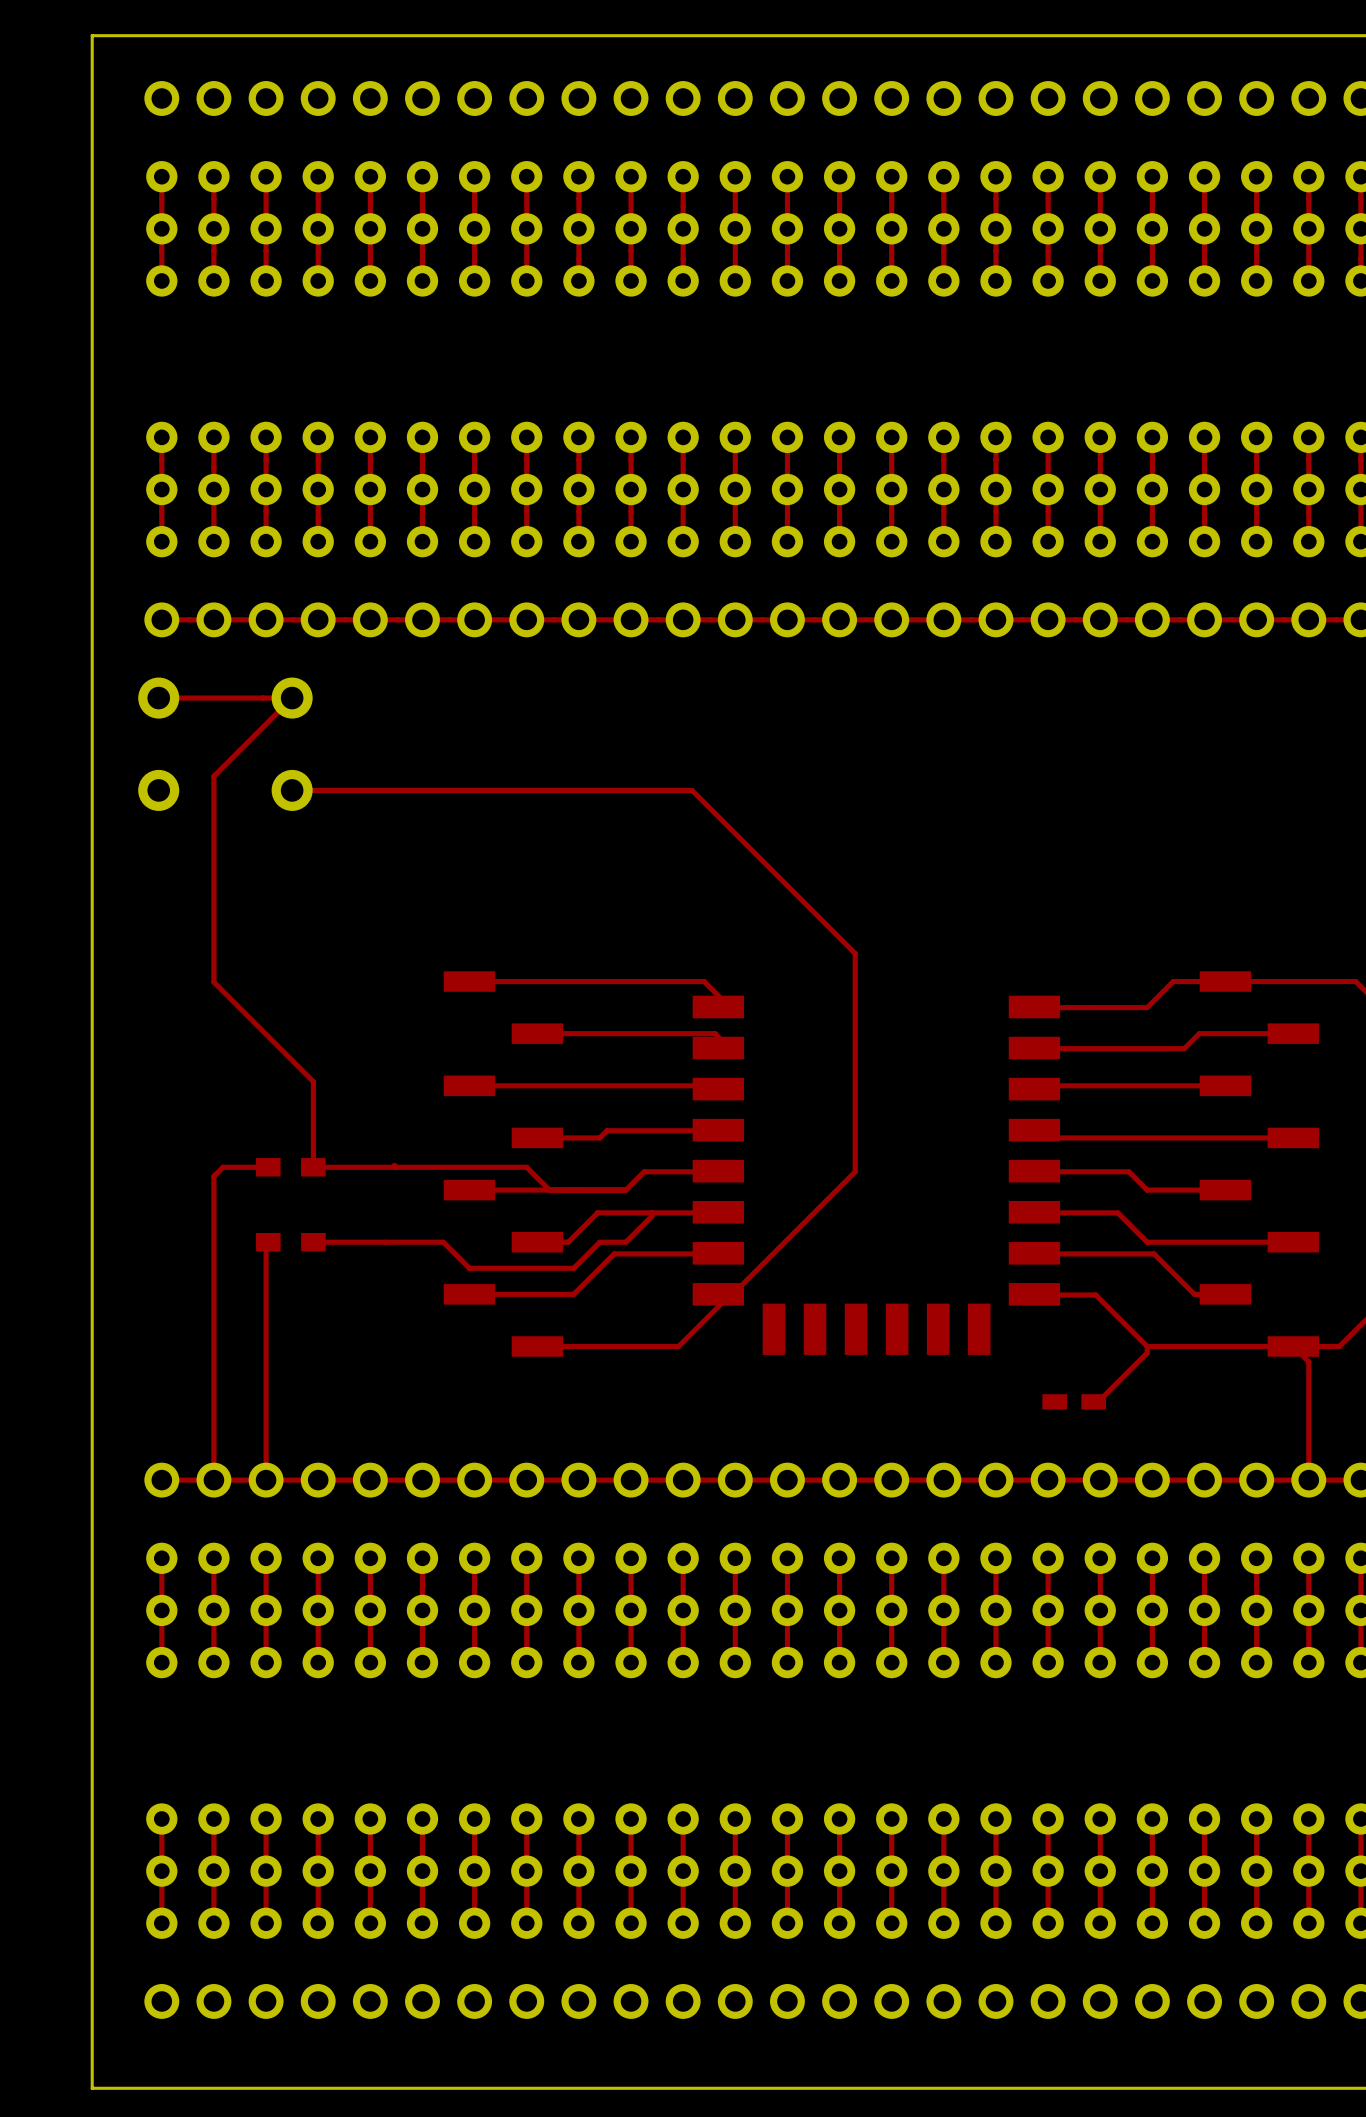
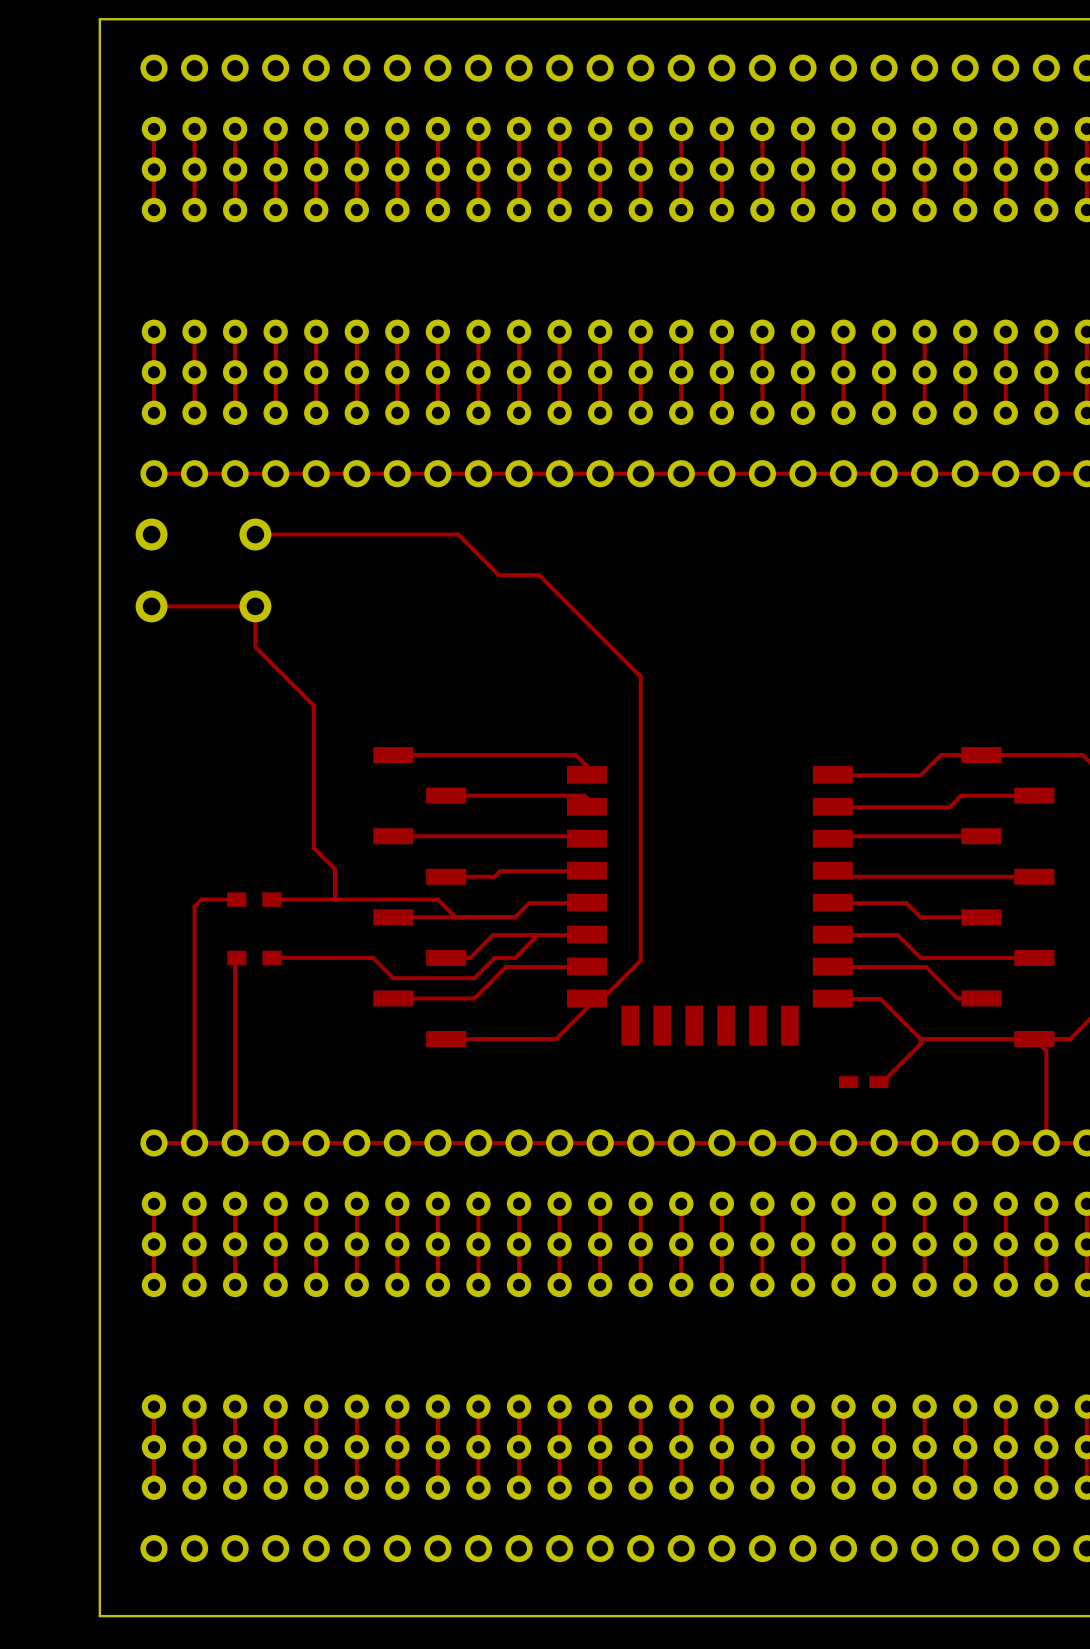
top track: (158, 698) (292, 698) (213, 776) (213, 982) (313, 1081) (313, 1167) -> none
top track: none -> (255, 534) (458, 534) (498, 575) (539, 575) (640, 676) (640, 960) (602, 998)
top track: none -> (151, 606) (255, 606) (255, 646) (313, 705) (313, 848) (334, 869) (334, 898)
top track: (292, 790) (692, 790) (855, 953) (855, 1171) (732, 1294) -> none

